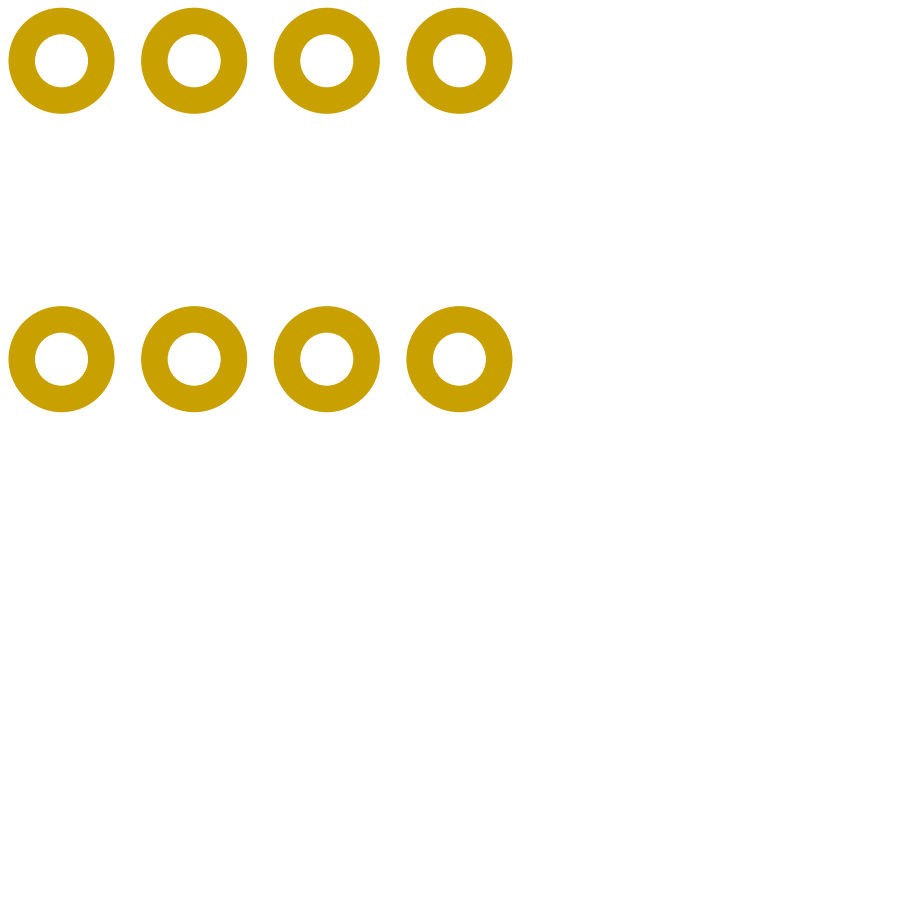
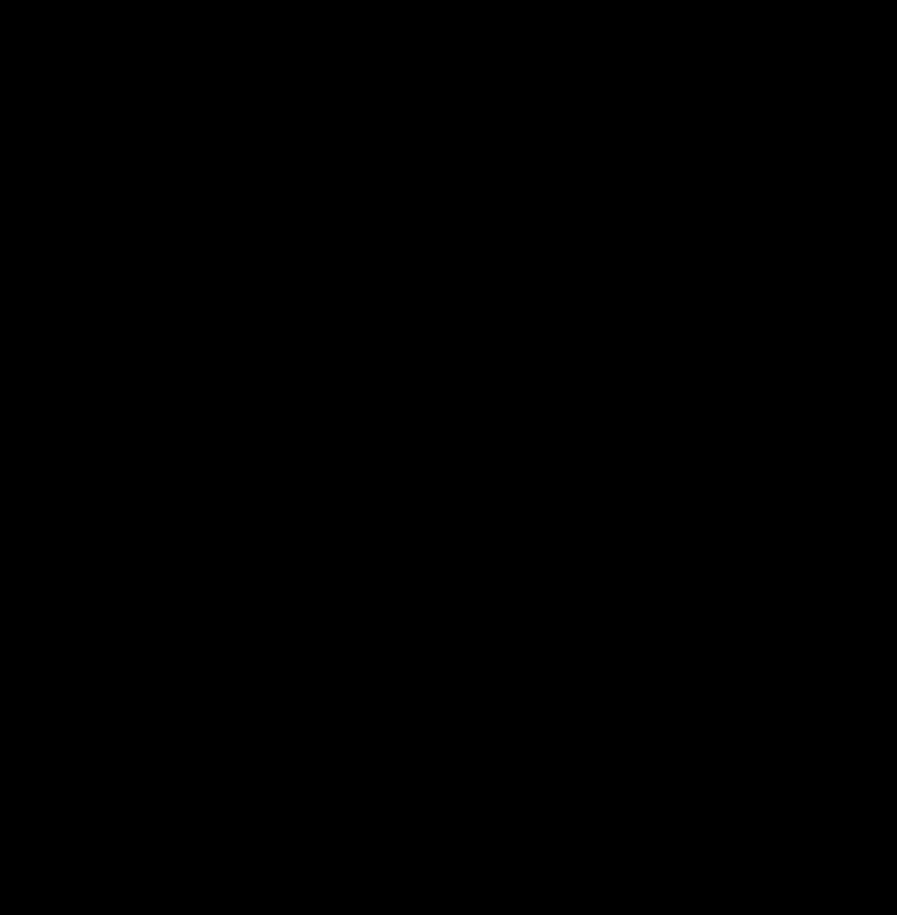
part: (260, 60) -> none
part: (260, 359) -> none

